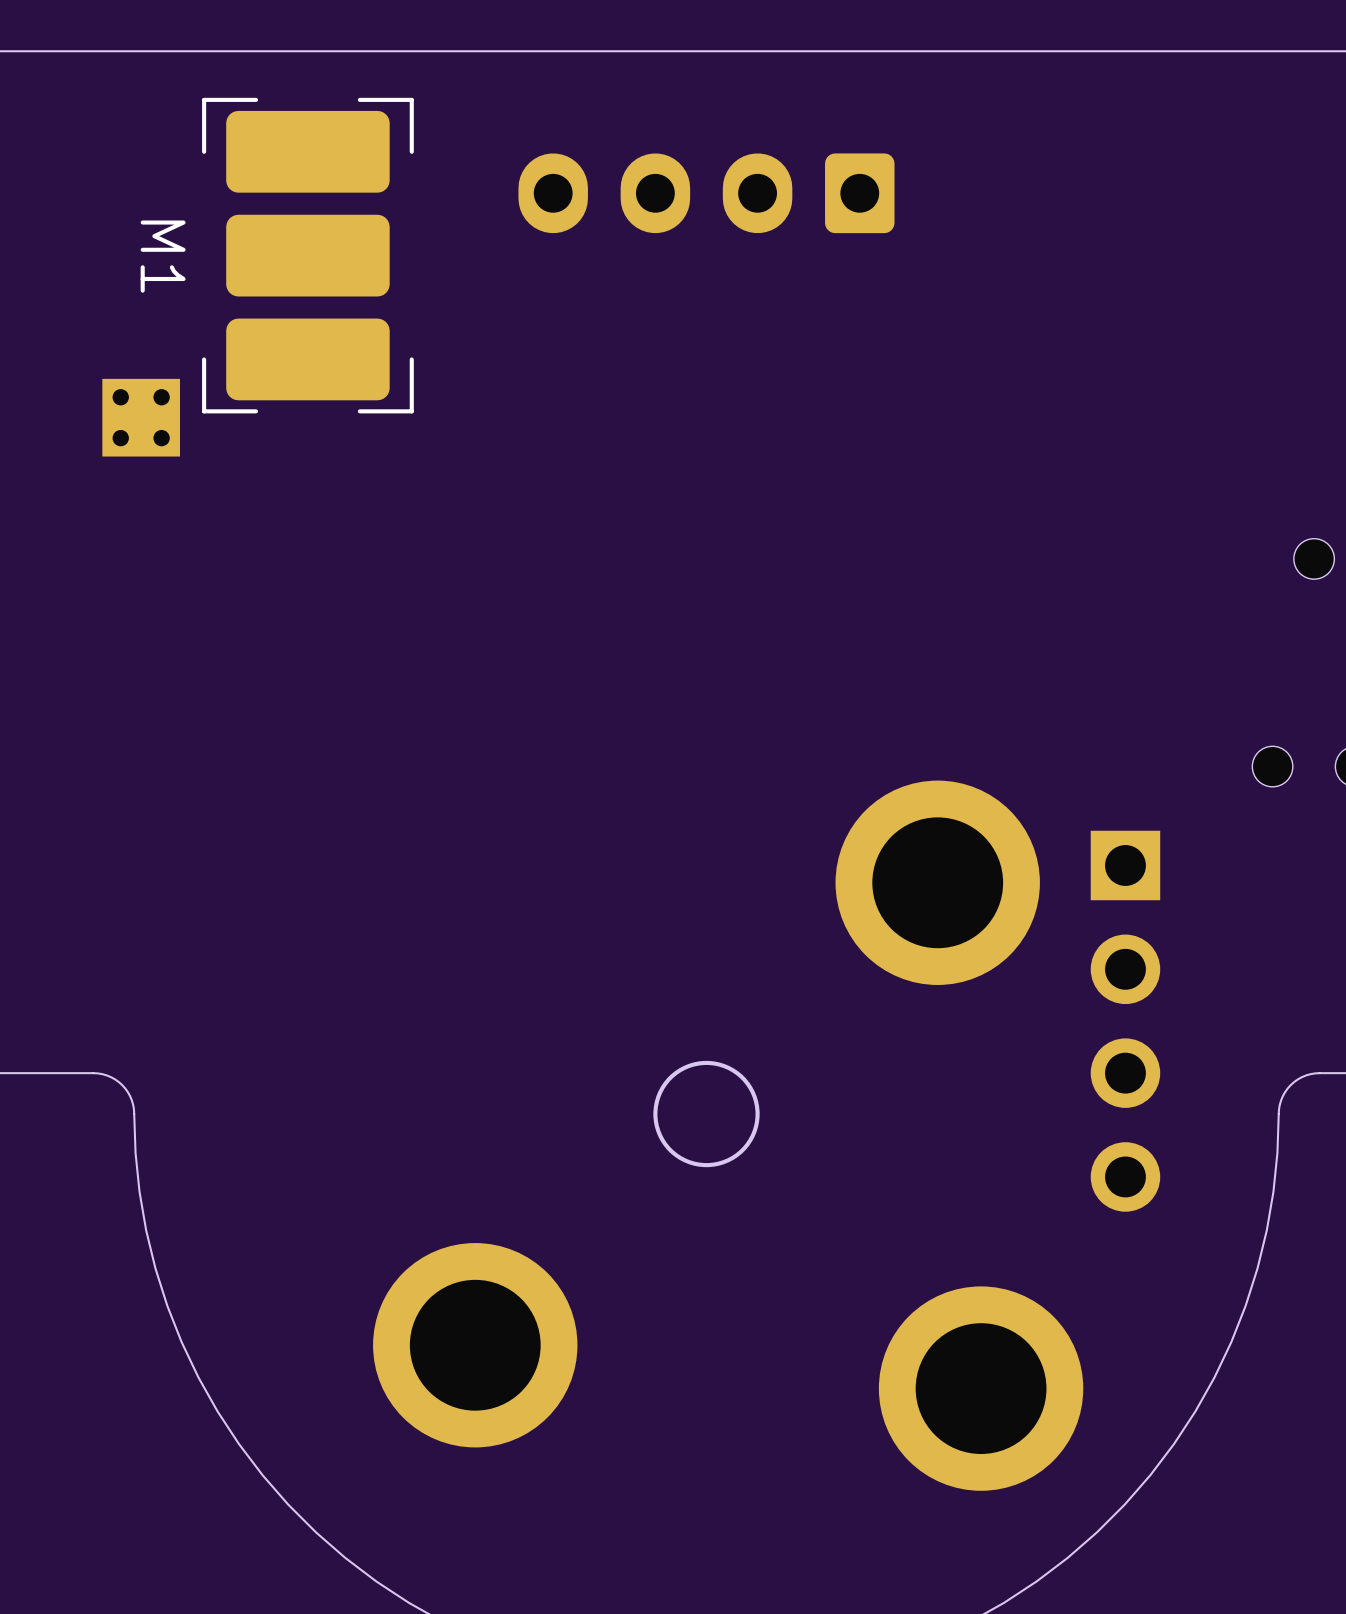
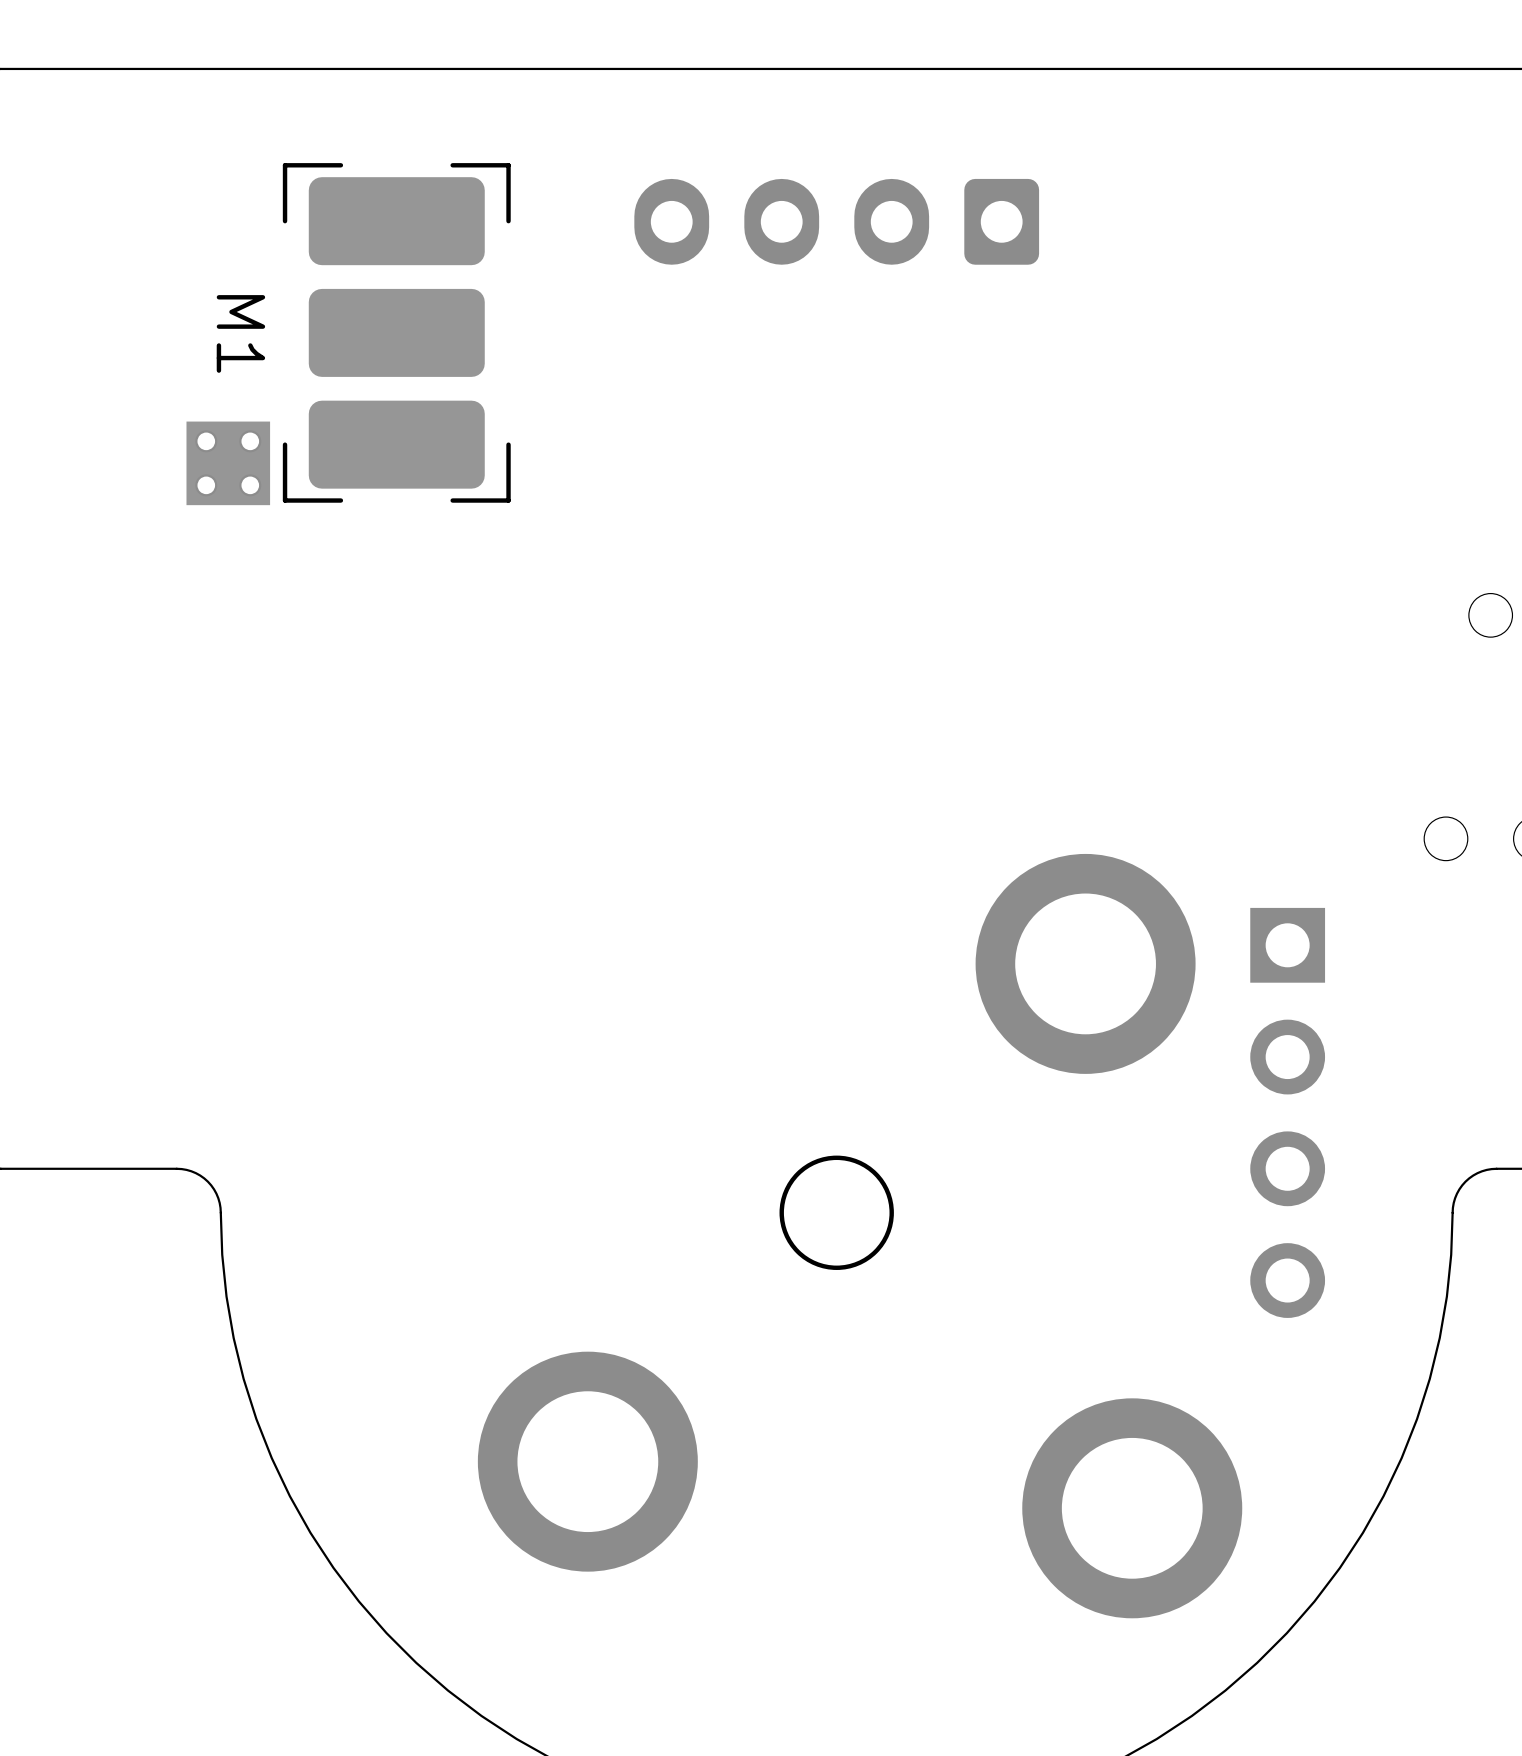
M1 position: (307, 255) -> (396, 332)

